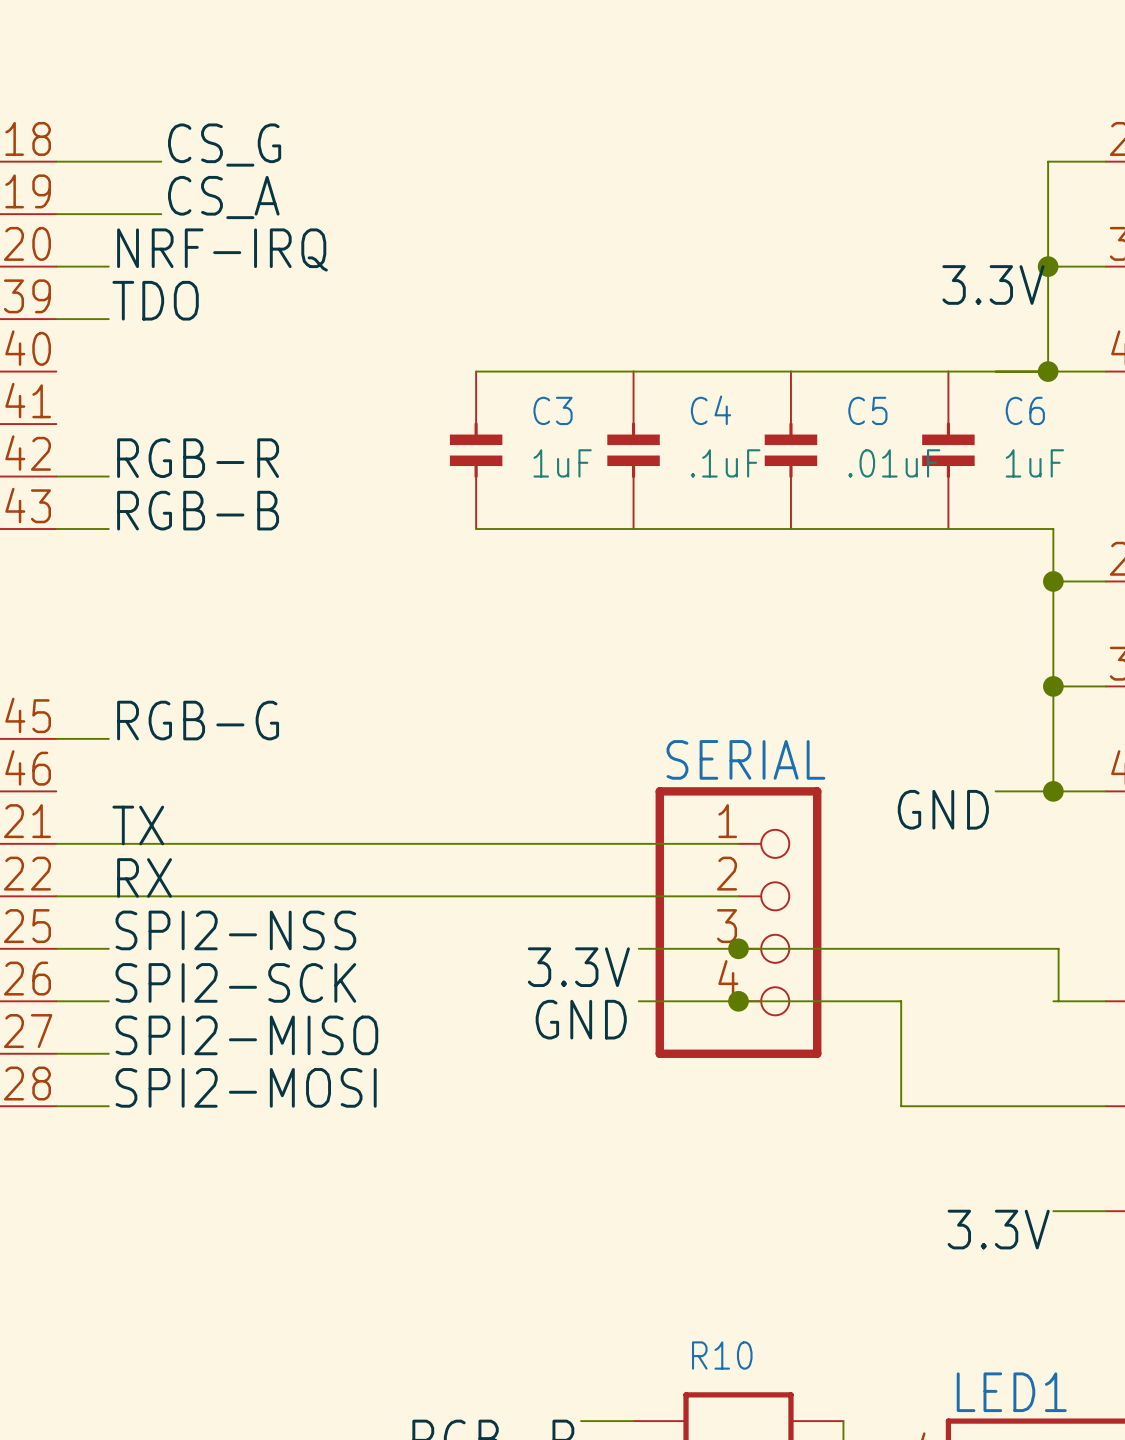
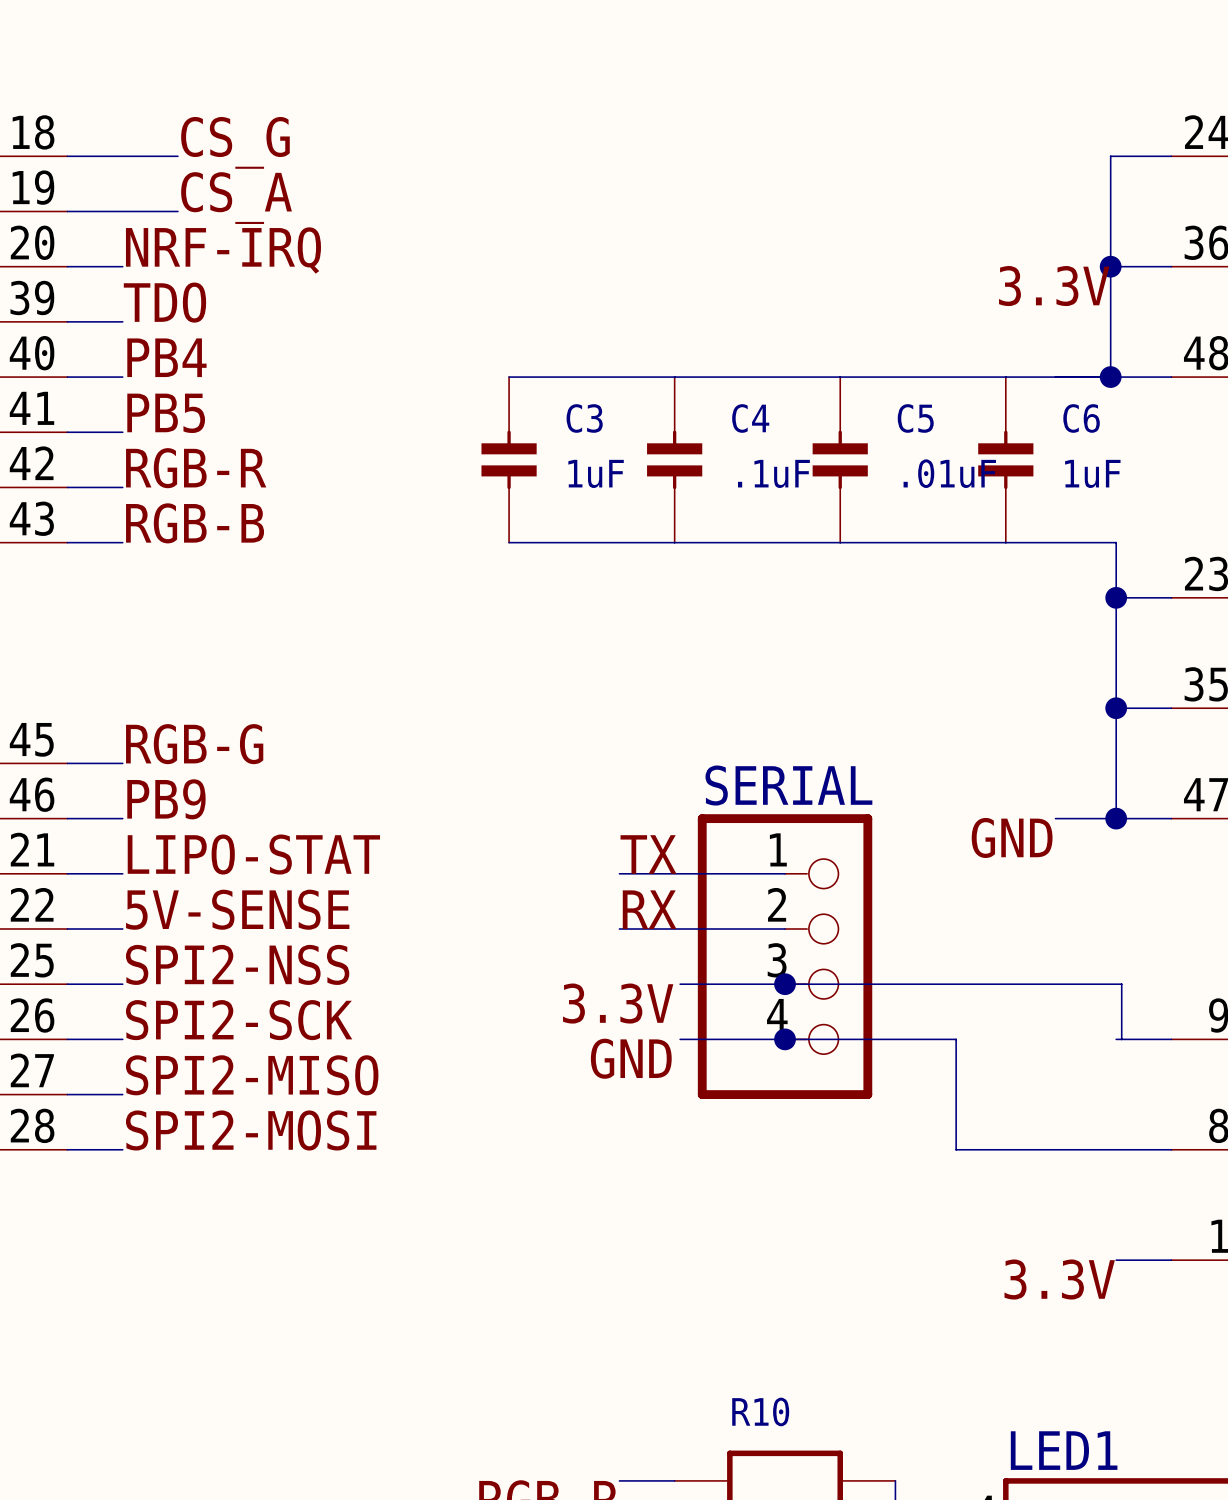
label: none -> PB4 (166, 357)
wire: none -> (67, 377) (122, 377)
label: none -> PB5 (166, 413)
wire: none -> (67, 432) (122, 432)
label: none -> PB9 (166, 799)
wire: none -> (67, 818) (122, 818)
label: TX (138, 825) -> LIPO-STAT (253, 854)
label: none -> TX (648, 854)
wire: (108, 843) (581, 843) -> none
label: RX (144, 877) -> 5V-SENSE (237, 909)
label: none -> RX (649, 909)
wire: (108, 896) (581, 896) -> none

